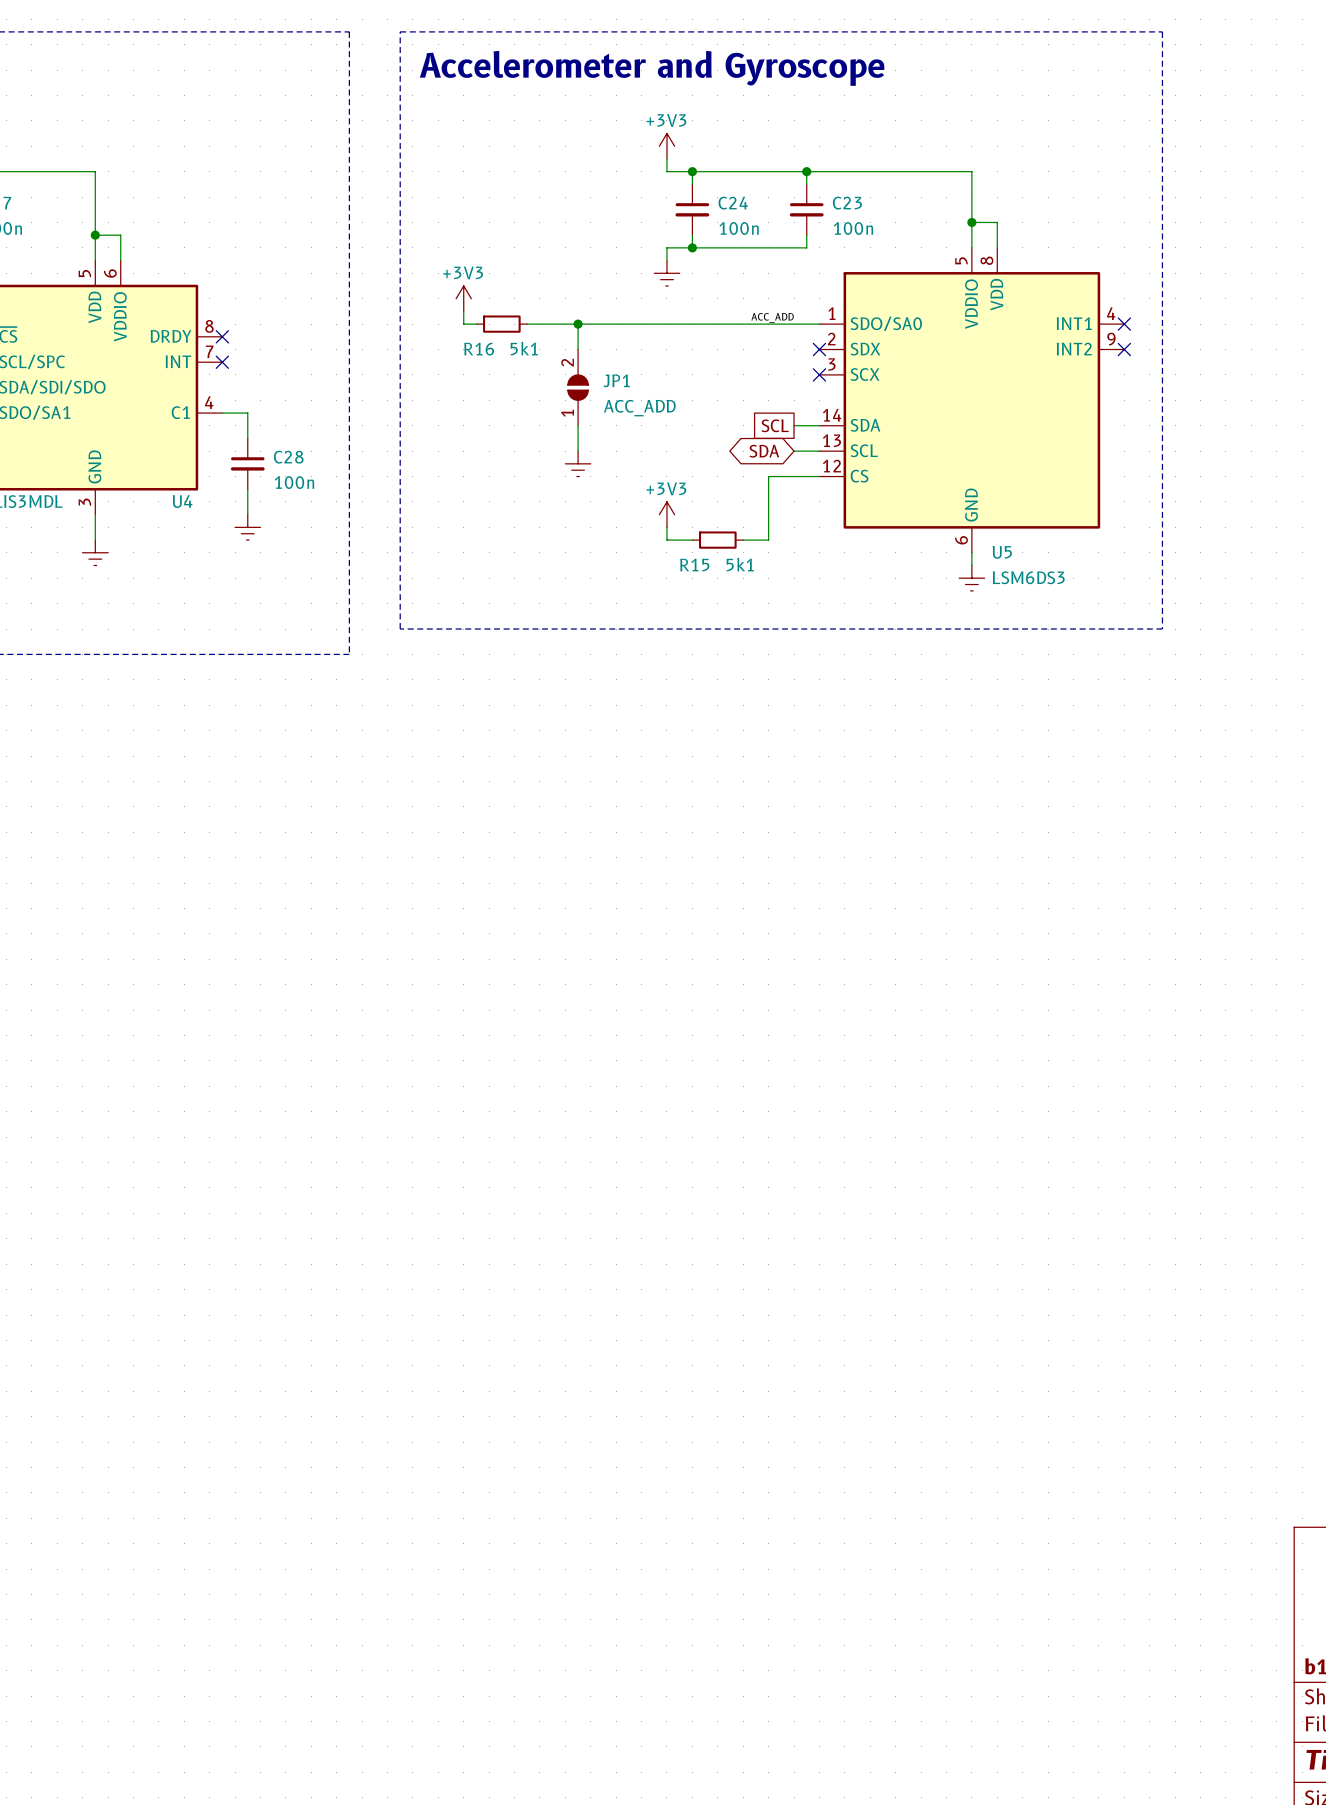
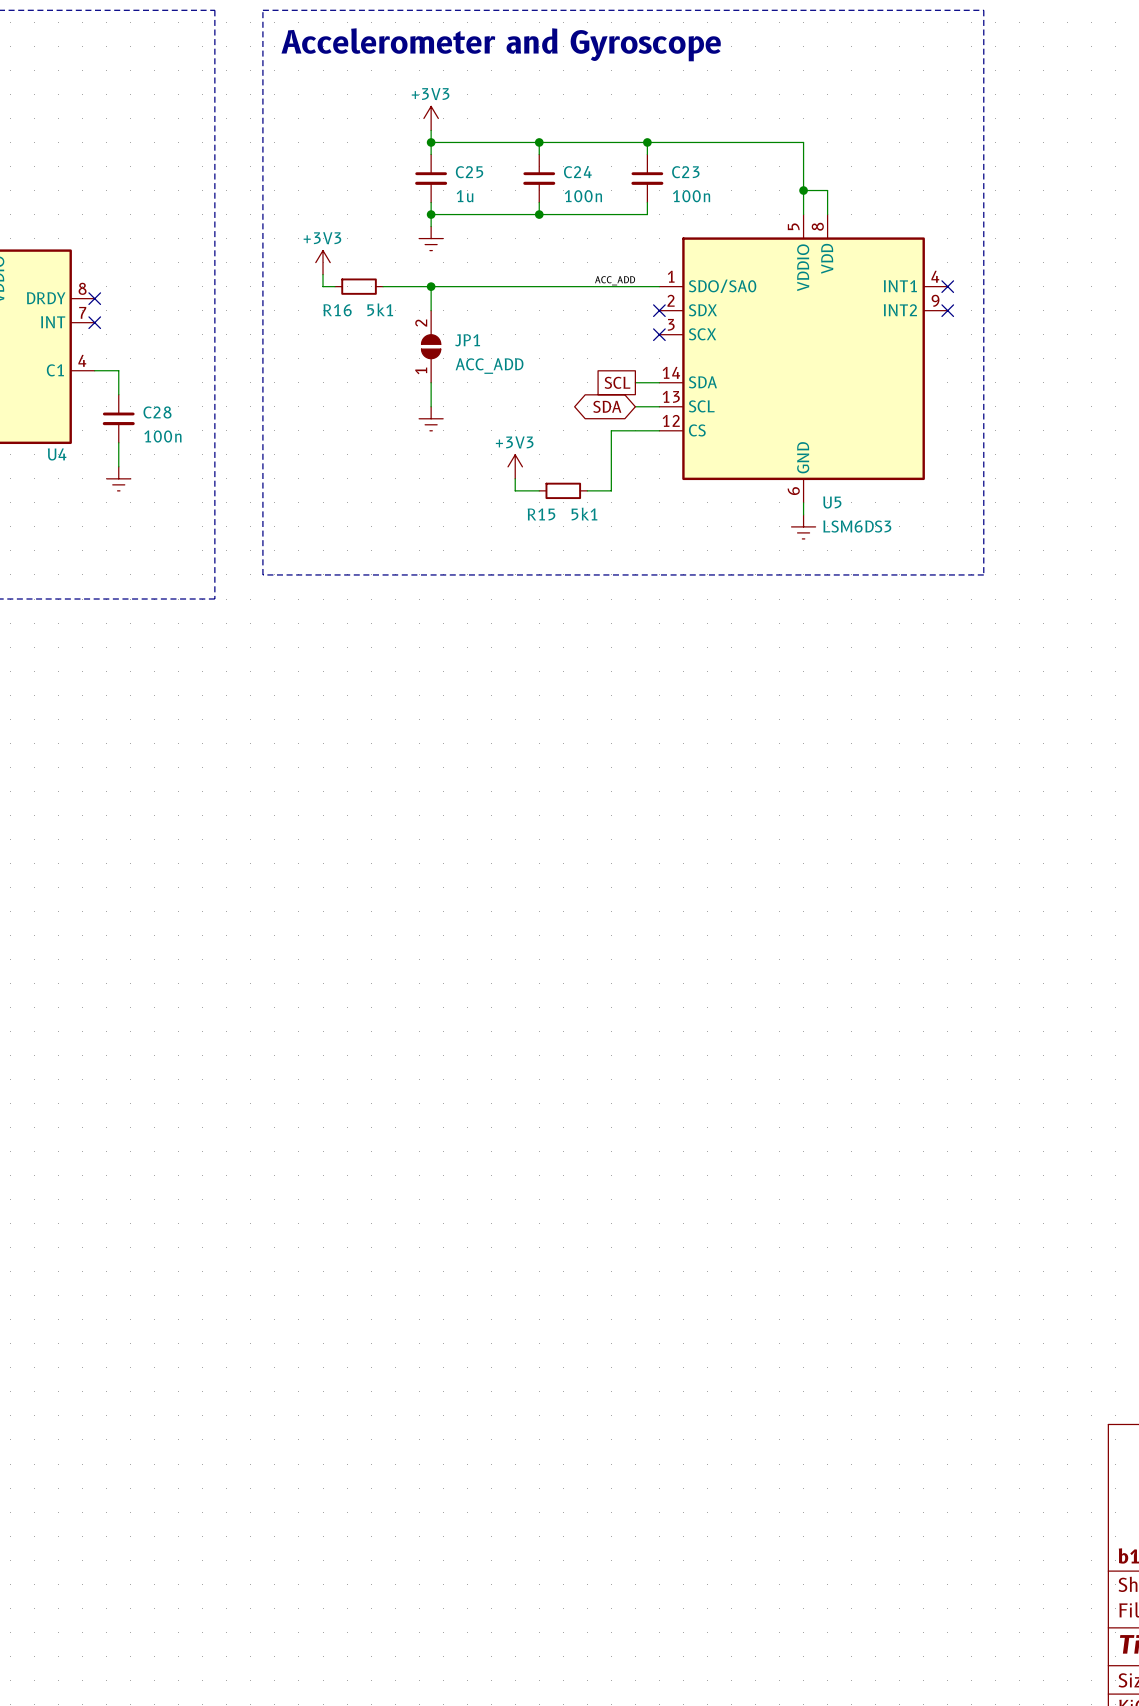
power symbol position: +3V3 (666, 146) -> +3V3 (431, 118)
wire: none -> (431, 130) (431, 154)
wire: (666, 158) (666, 171) -> (431, 142) (515, 142)
junction: none -> (431, 142)
C25: none -> 1u (431, 178)
wire: none -> (431, 202) (431, 226)
junction: none -> (431, 214)
wire: (666, 247) (666, 260) -> (515, 214) (431, 214)
power symbol position: (666, 273) -> (431, 238)

